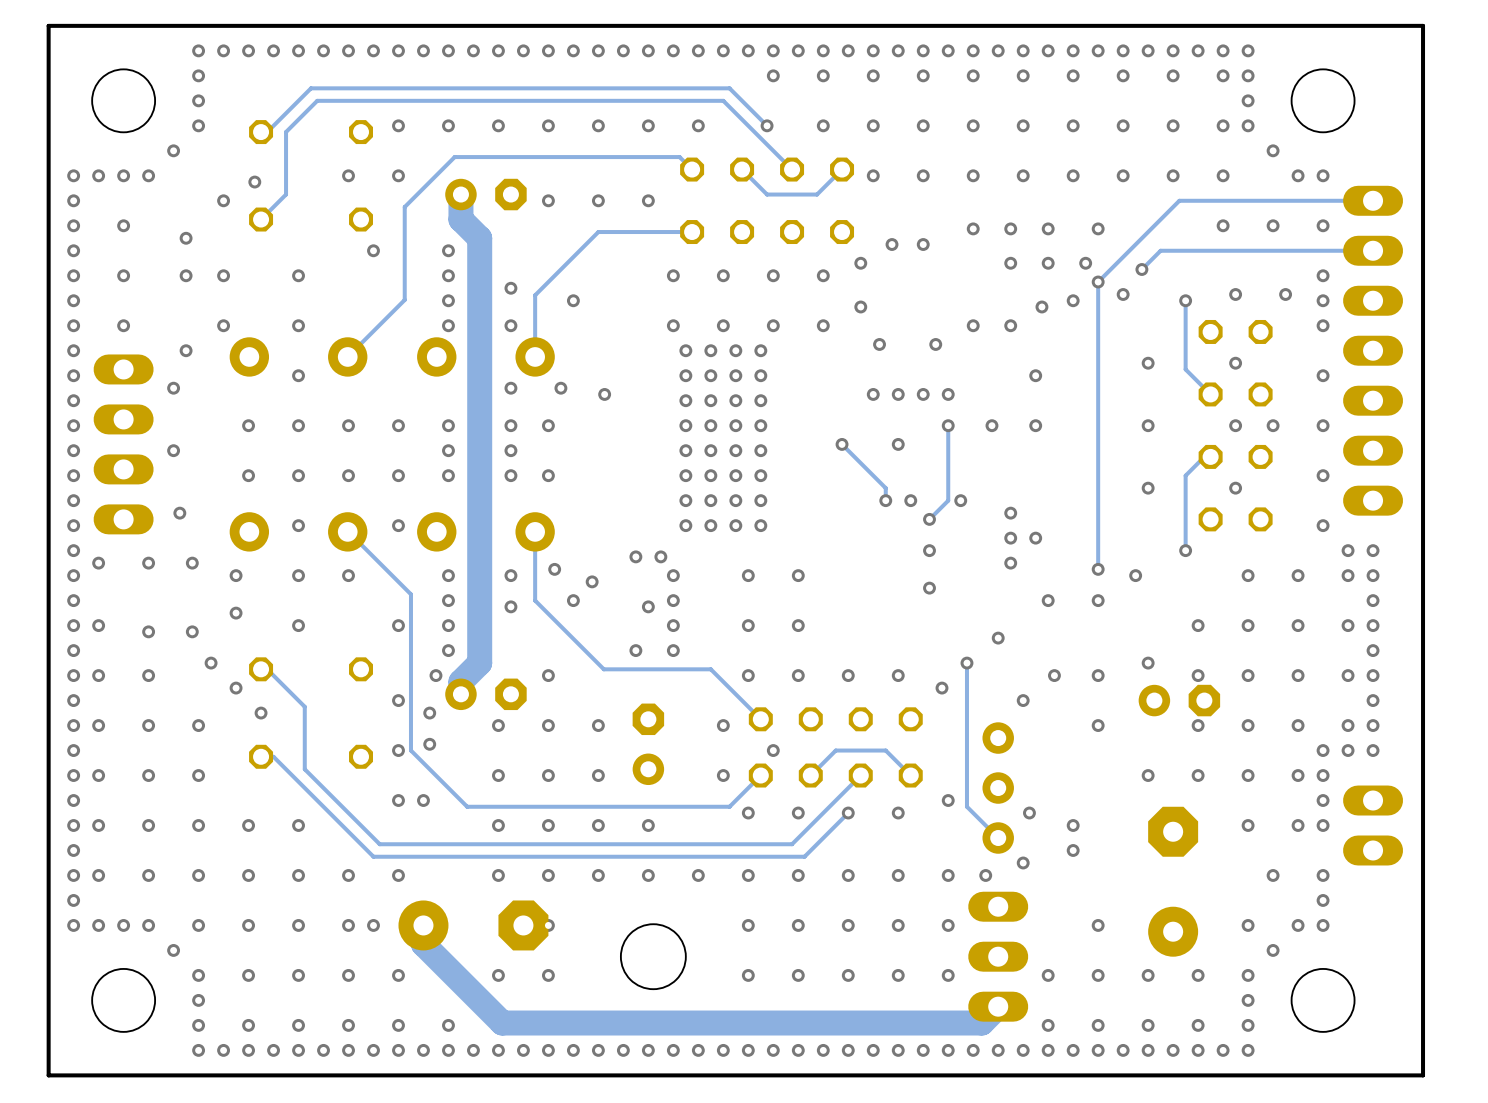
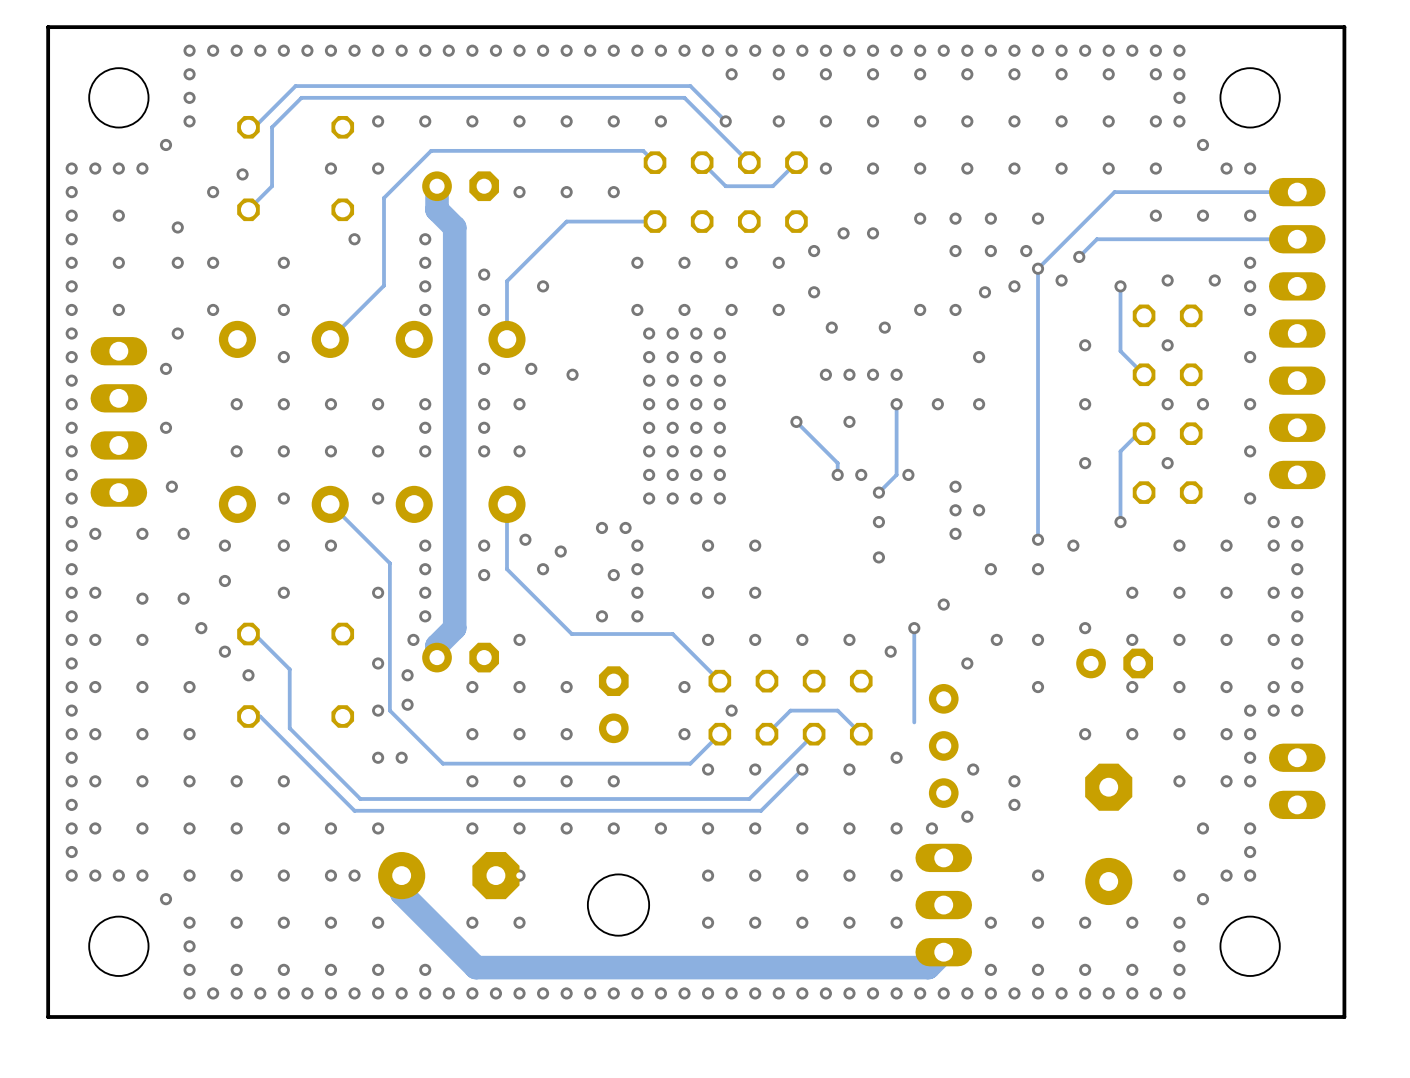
track: (966, 763) (966, 806) (998, 838) -> none

